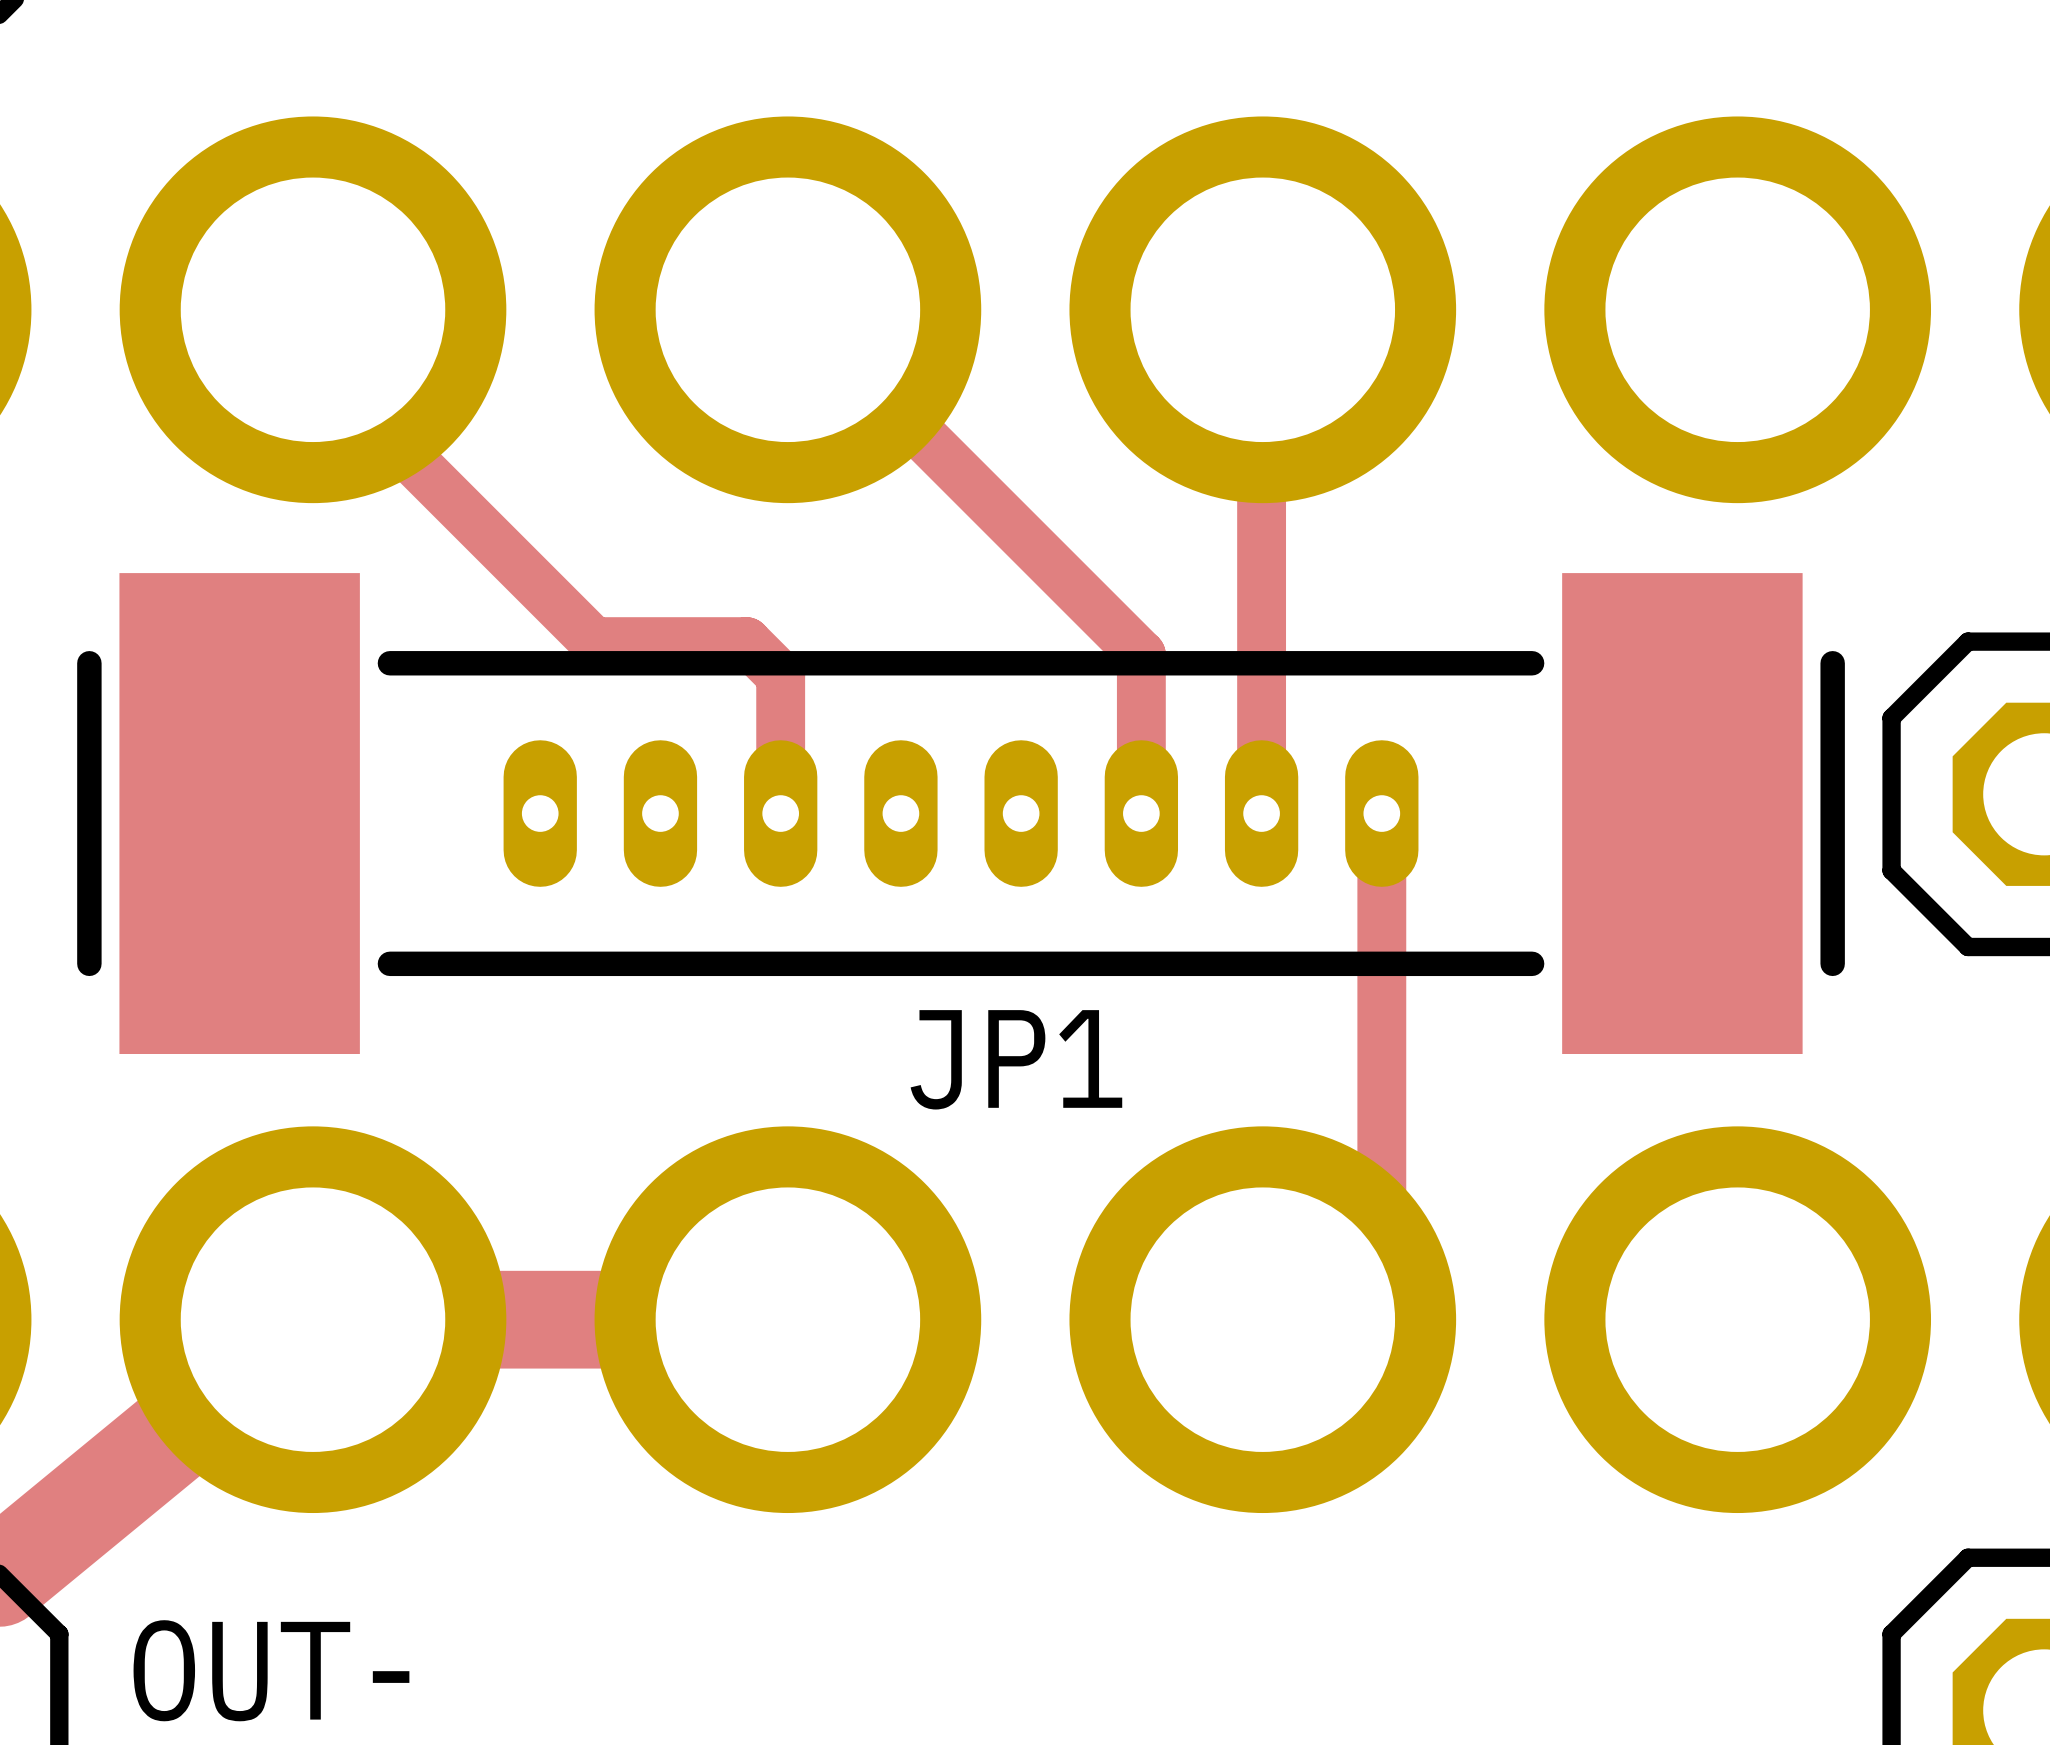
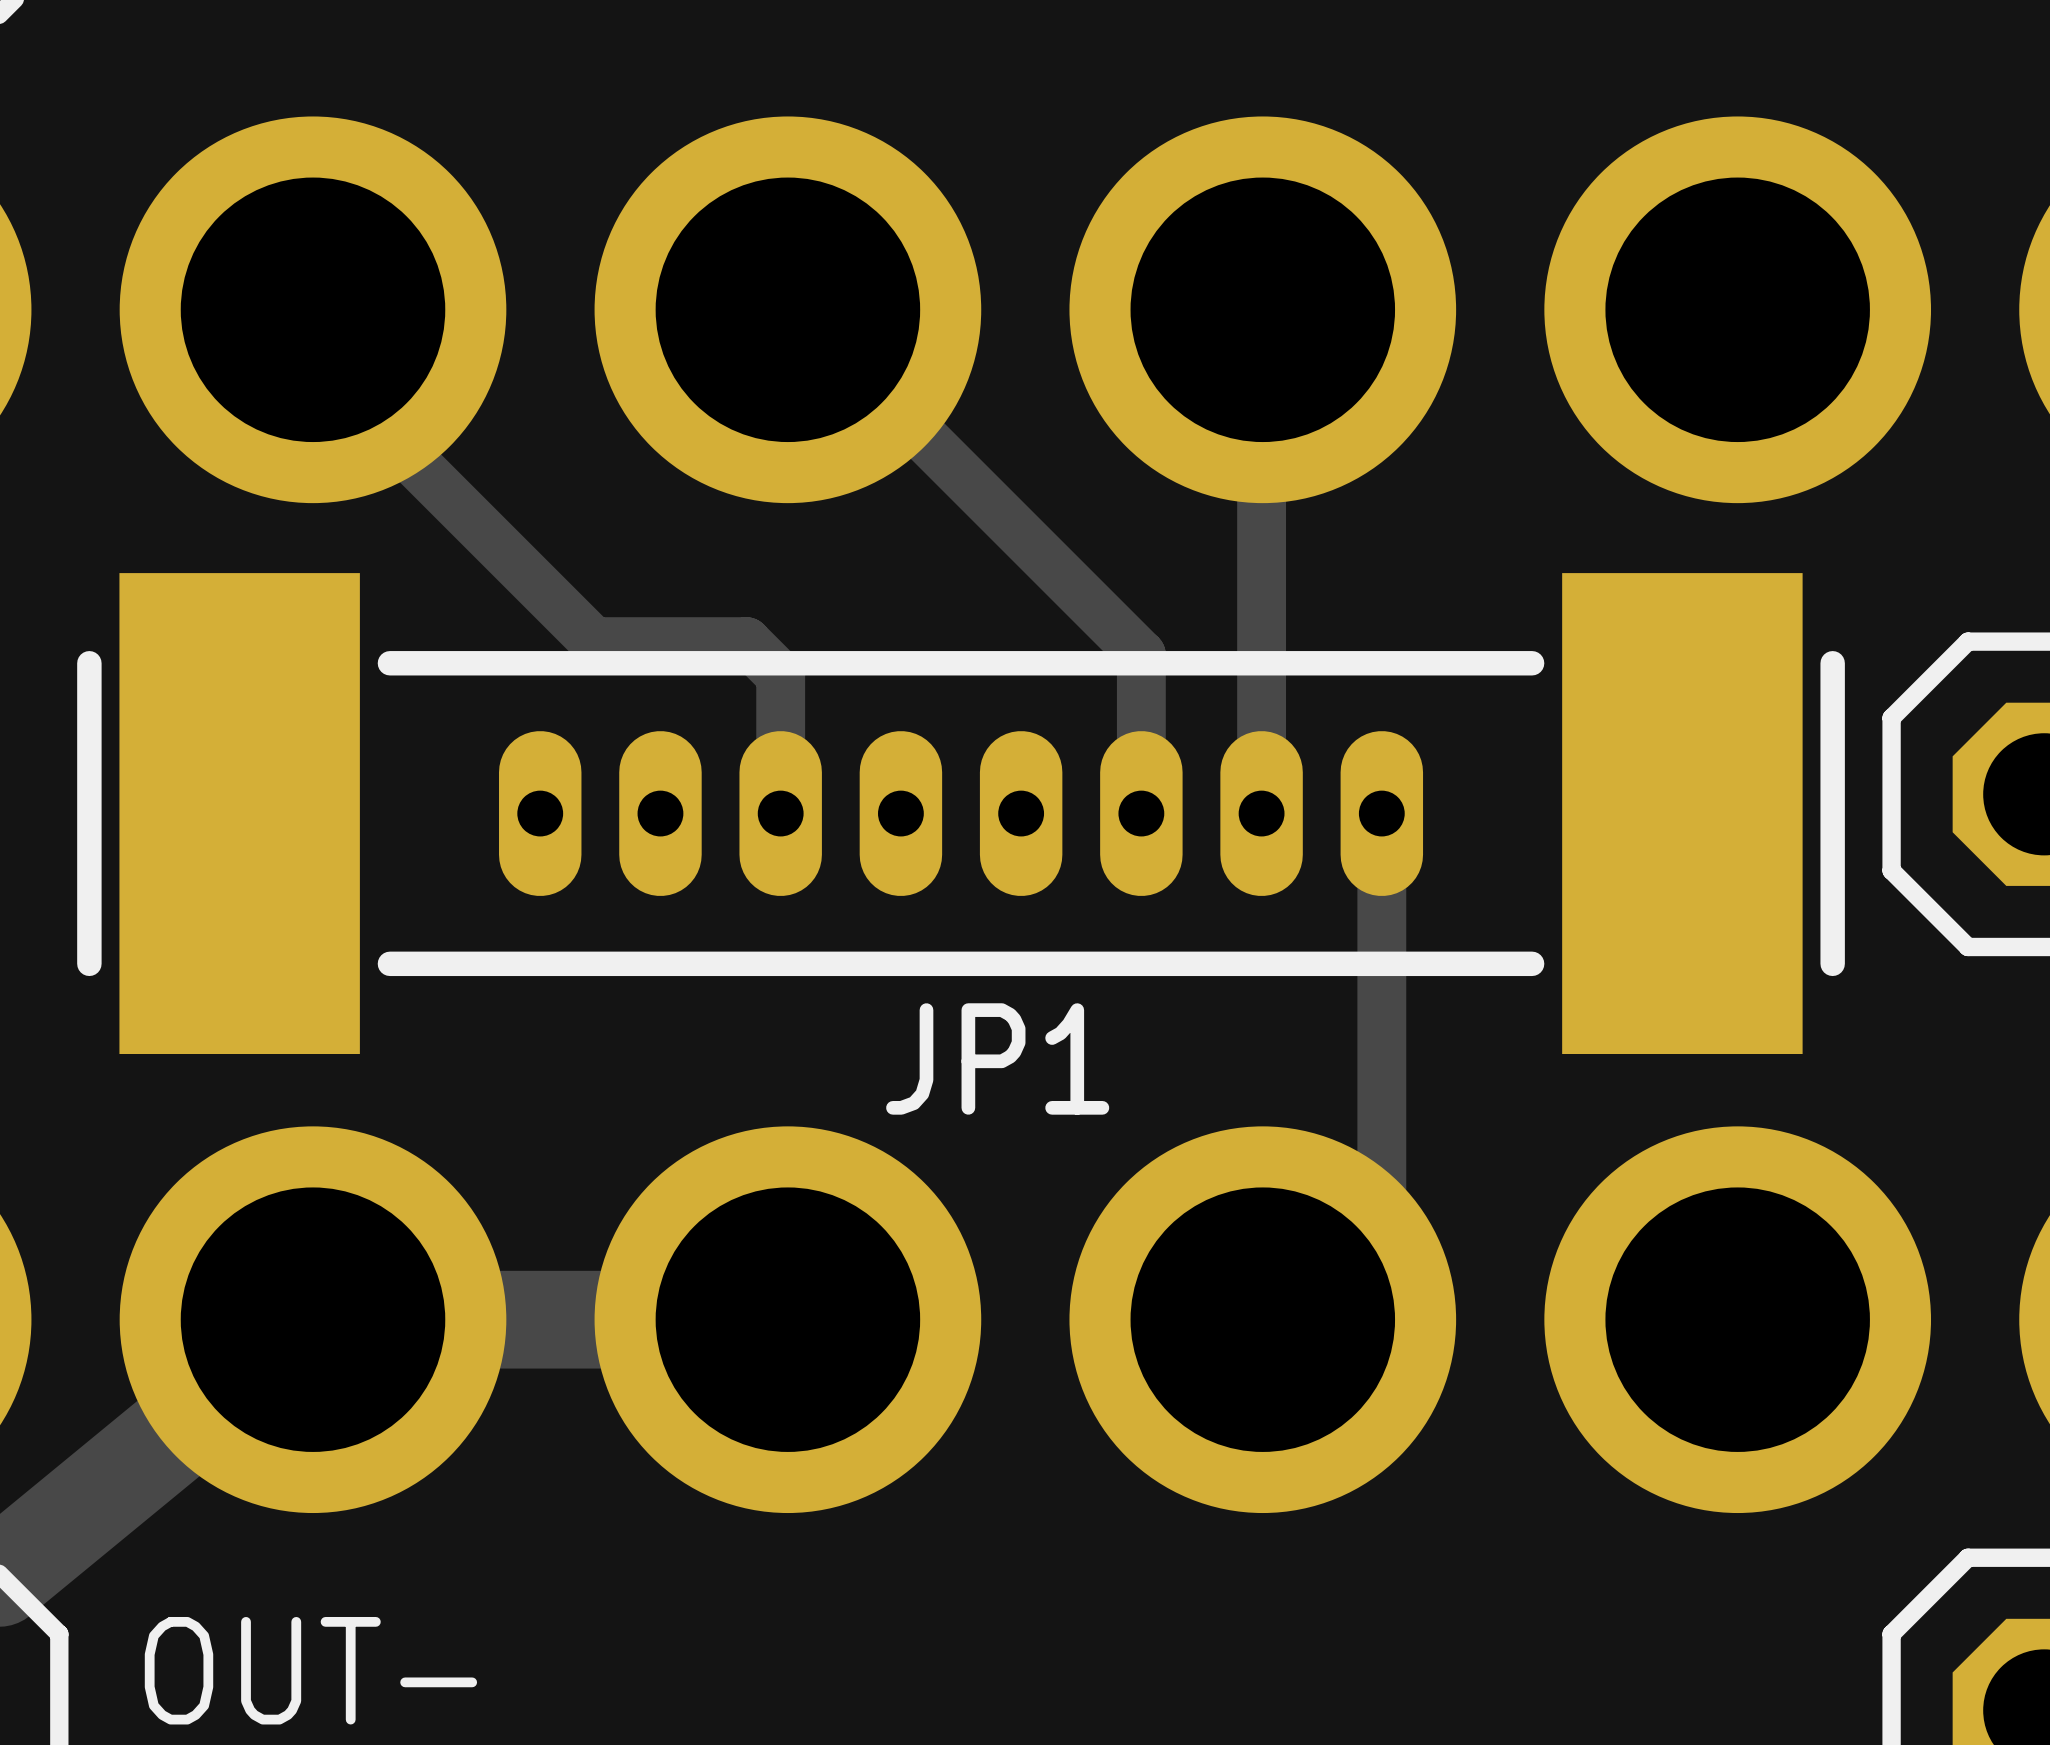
JP1 footprint: [77, 573, 1845, 1054] -> [77, 573, 1845, 1054]

